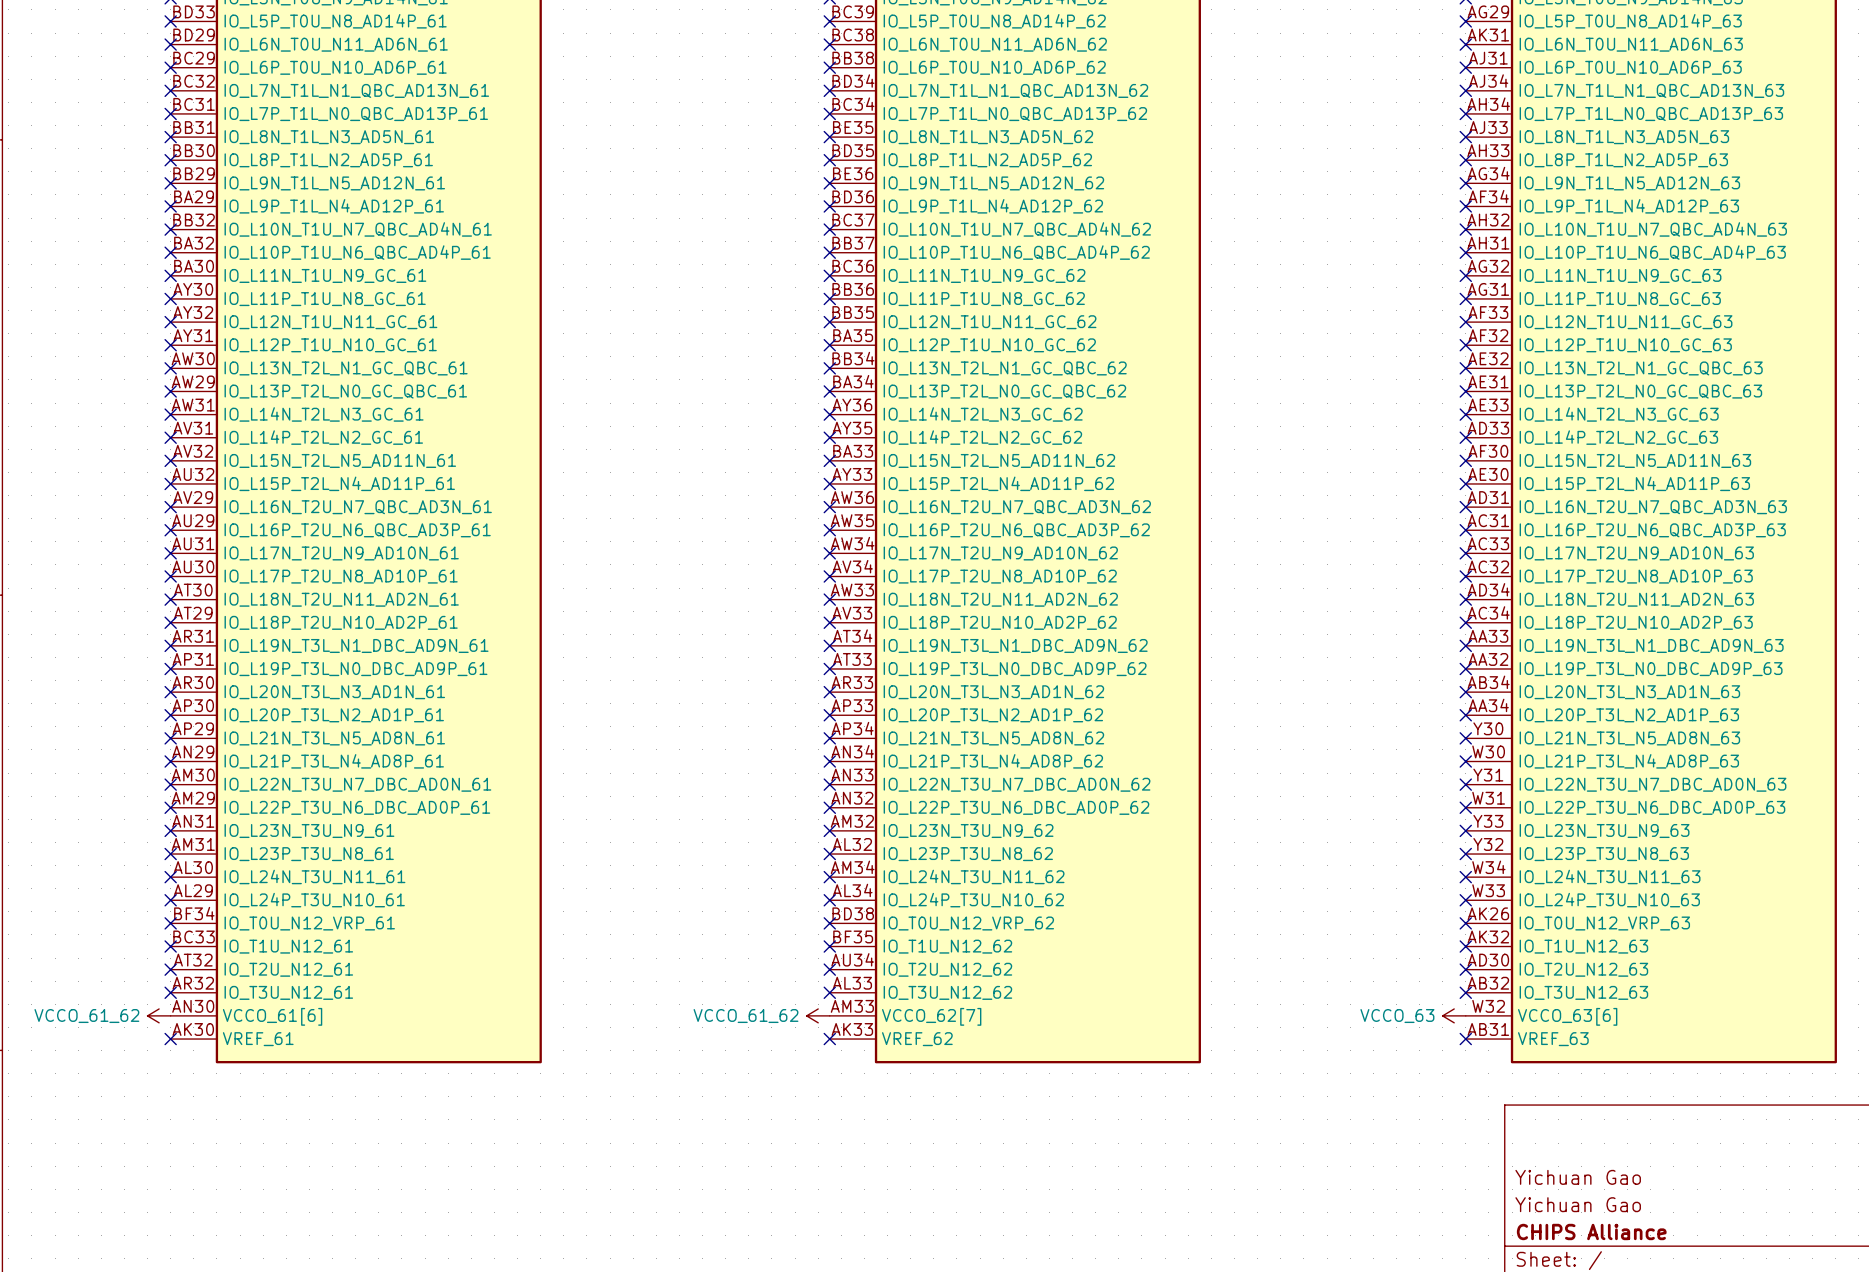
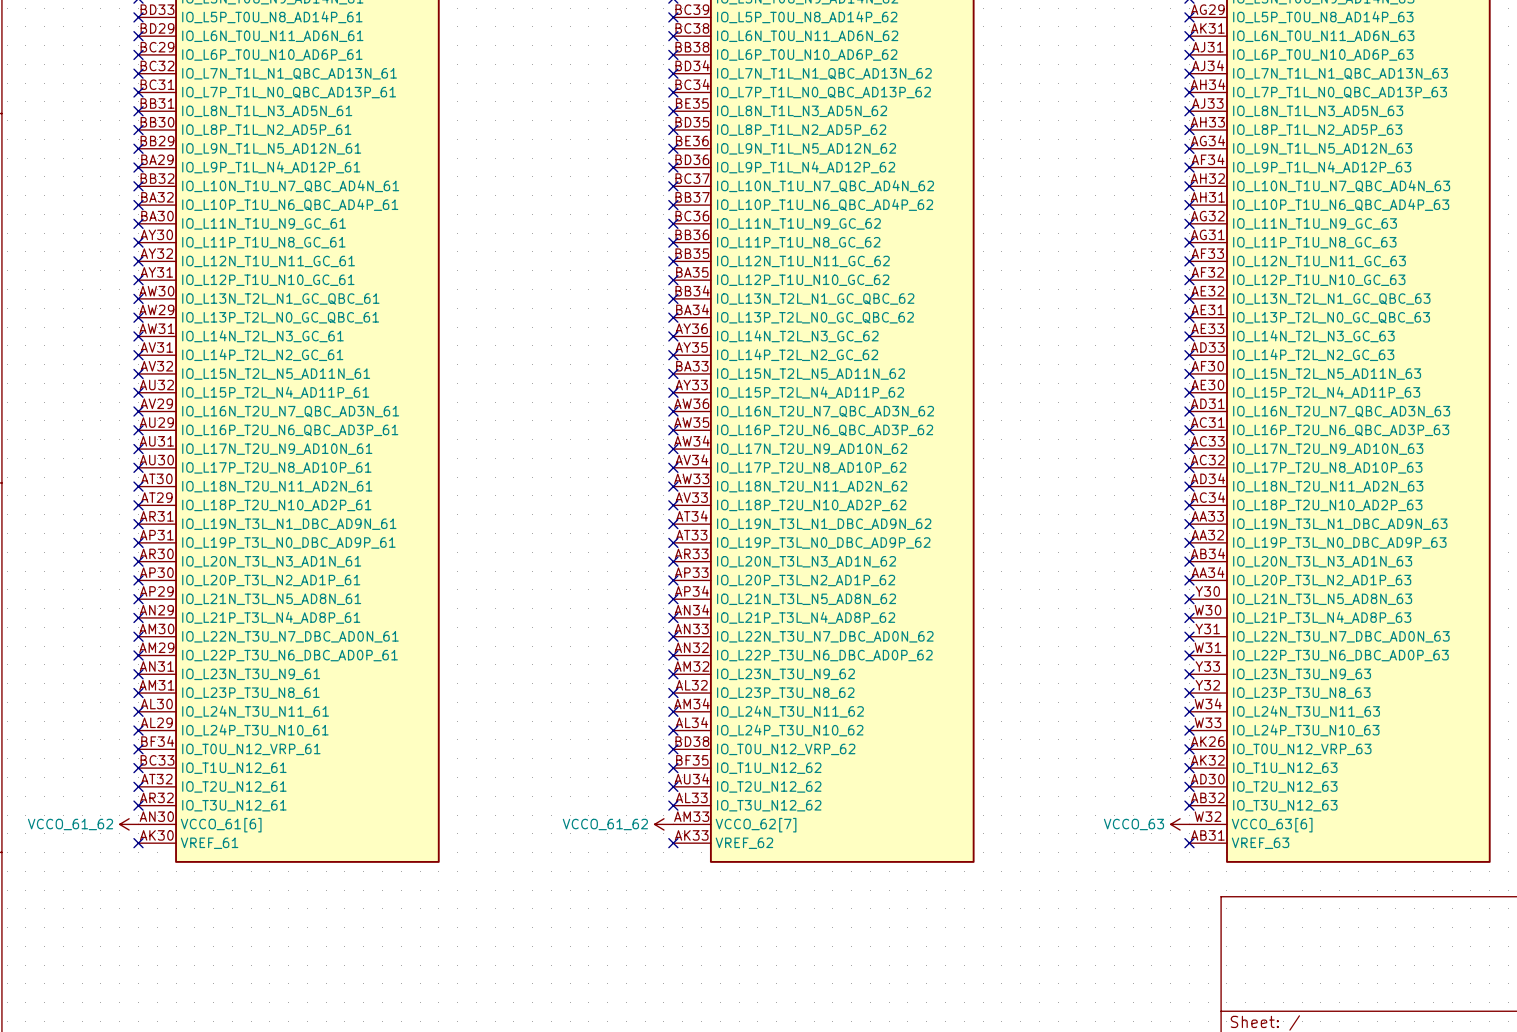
title block: Yichuan Gao (1578, 1177) -> none
title block: Yichuan Gao (1578, 1204) -> none
title block: CHIPS Alliance (1591, 1231) -> none

